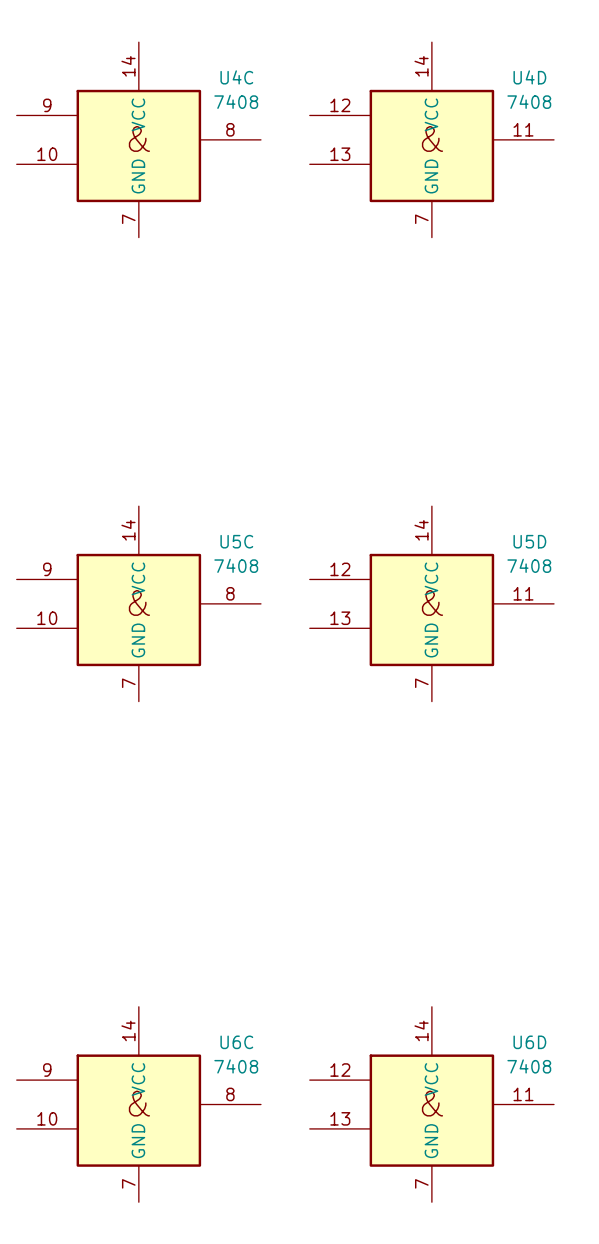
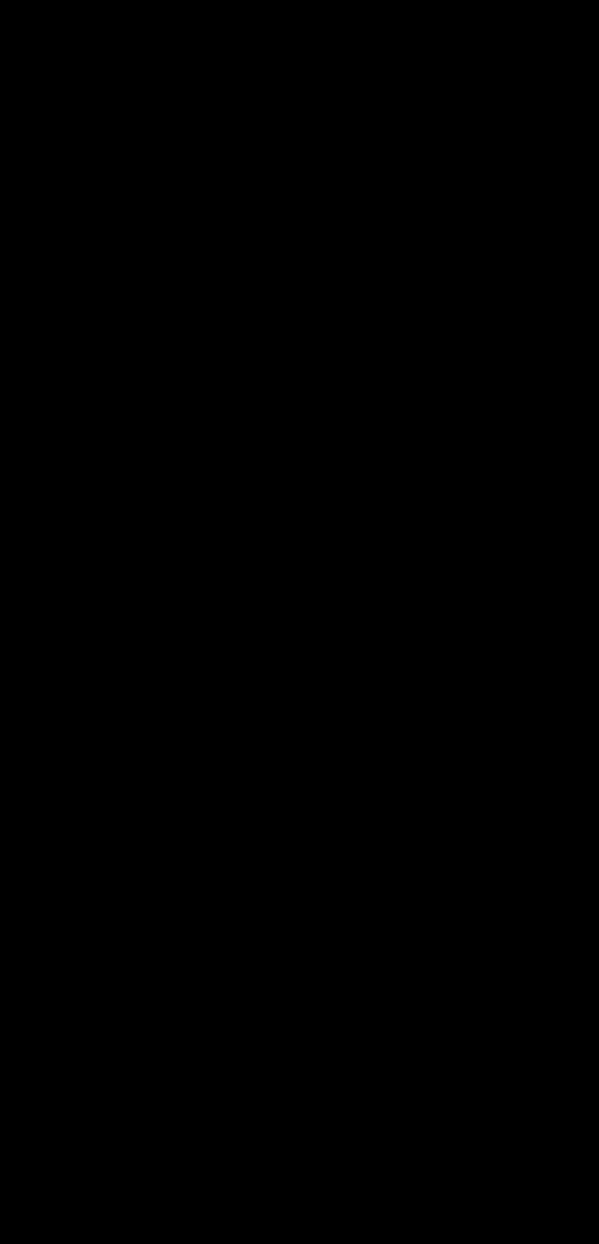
U4C: 7408 (138, 139) -> none
U4D: 7408 (431, 139) -> none
U5C: 7408 (138, 603) -> none
U5D: 7408 (431, 603) -> none
U6C: 7408 (138, 1104) -> none
U6D: 7408 (431, 1104) -> none

